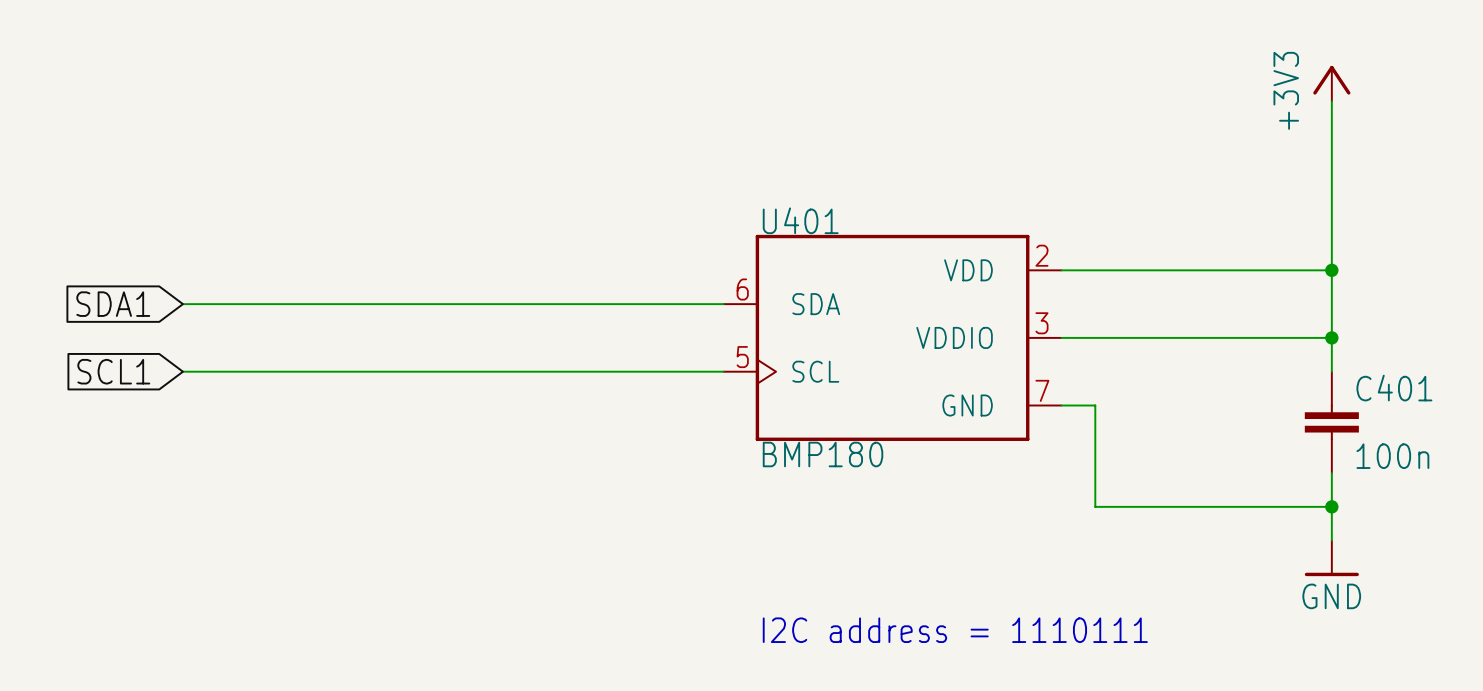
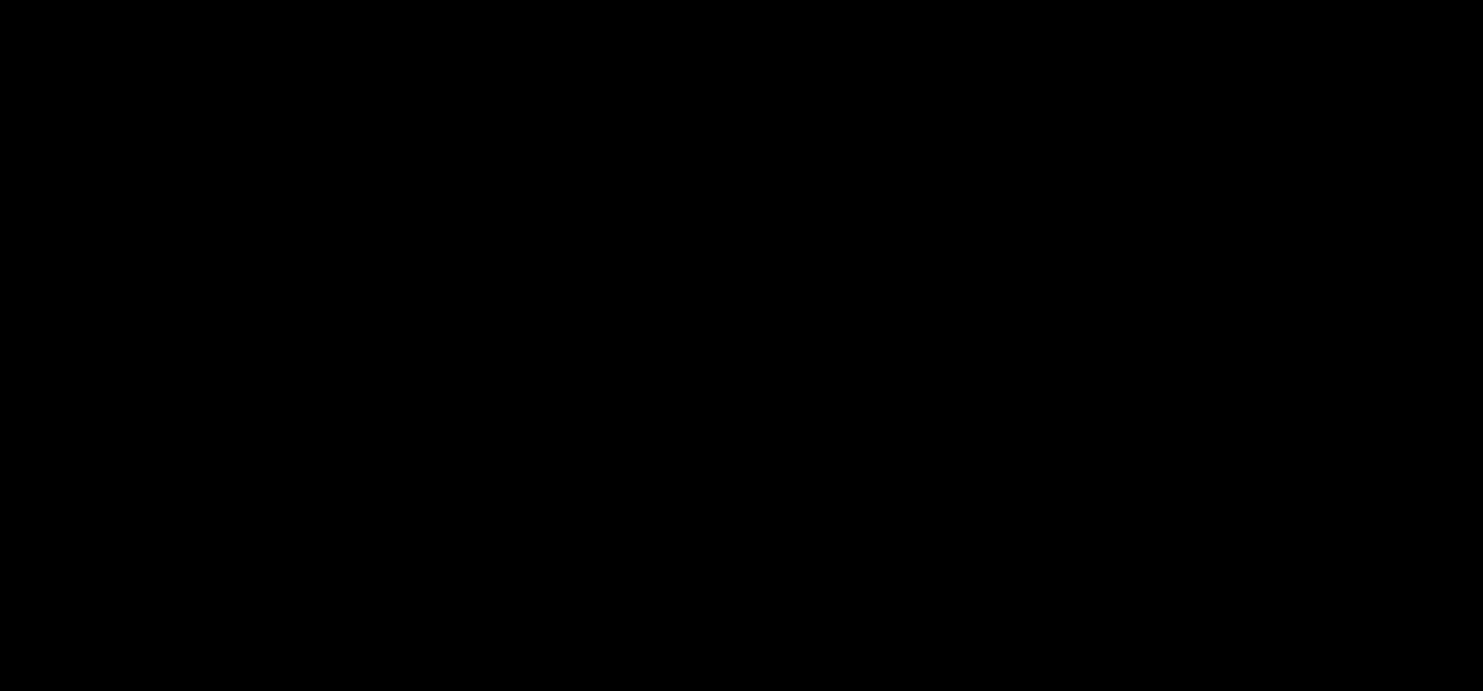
power symbol: +3V3 (1331, 83) -> none
wire: (1331, 101) (1331, 371) -> none
wire: (1061, 270) (1331, 270) -> none
junction: (1331, 270) -> none
global label: SDA1 (113, 304) -> none
wire: (182, 304) (723, 304) -> none
U401: BMP180 (892, 337) -> none
wire: (1061, 337) (1331, 337) -> none
junction: (1331, 337) -> none
global label: SCL1 (113, 371) -> none
wire: (182, 371) (723, 371) -> none
wire: (1061, 405) (1095, 405) (1095, 506) (1331, 506) -> none
C401: 100n (1331, 422) -> none
wire: (1331, 473) (1331, 540) -> none
junction: (1331, 506) -> none
power symbol: GND (1331, 558) -> none
text: I2C address = 1110111 (955, 630) -> none

